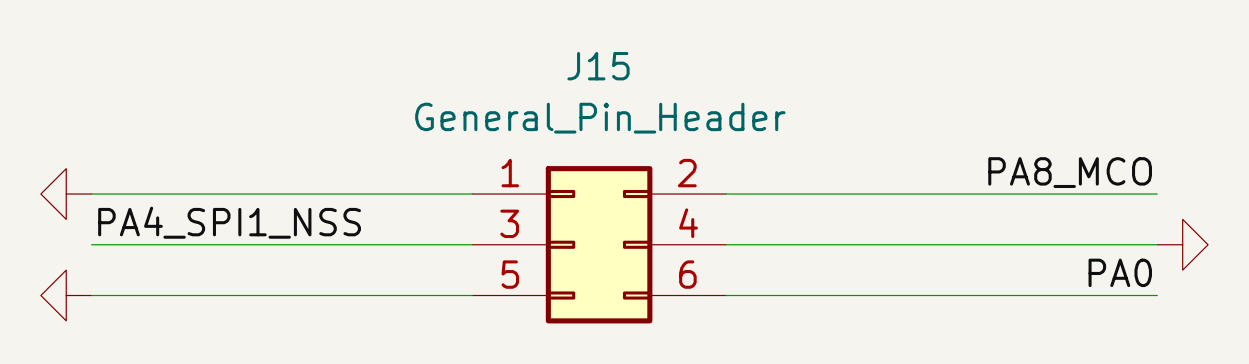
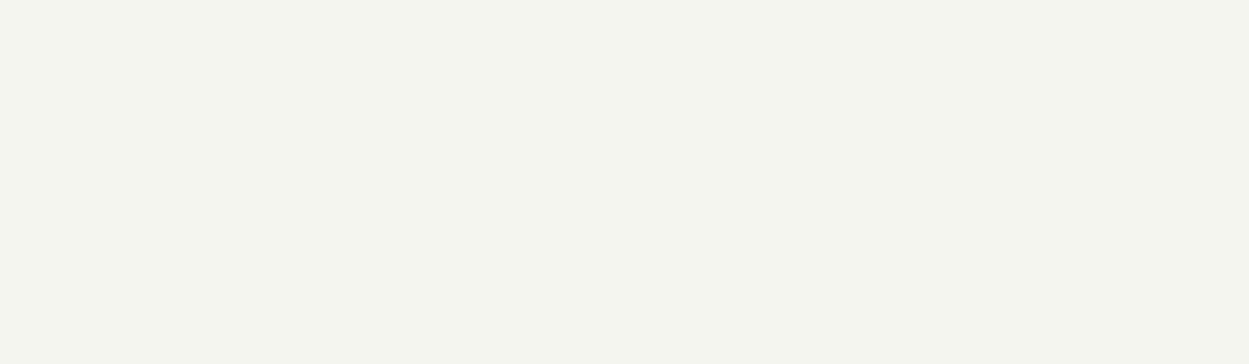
label: PA8_MCO (1070, 172) -> none
power symbol: (66, 194) -> none
wire: (91, 194) (472, 194) -> none
wire: (725, 194) (1157, 194) -> none
label: PA4_SPI1_NSS (229, 222) -> none
wire: (91, 244) (472, 244) -> none
J15: General_Pin_Header (599, 244) -> none
wire: (725, 244) (1157, 244) -> none
power symbol: (1182, 244) -> none
label: PA0 (1120, 272) -> none
power symbol: (66, 295) -> none
wire: (91, 295) (472, 295) -> none
wire: (725, 295) (1157, 295) -> none

